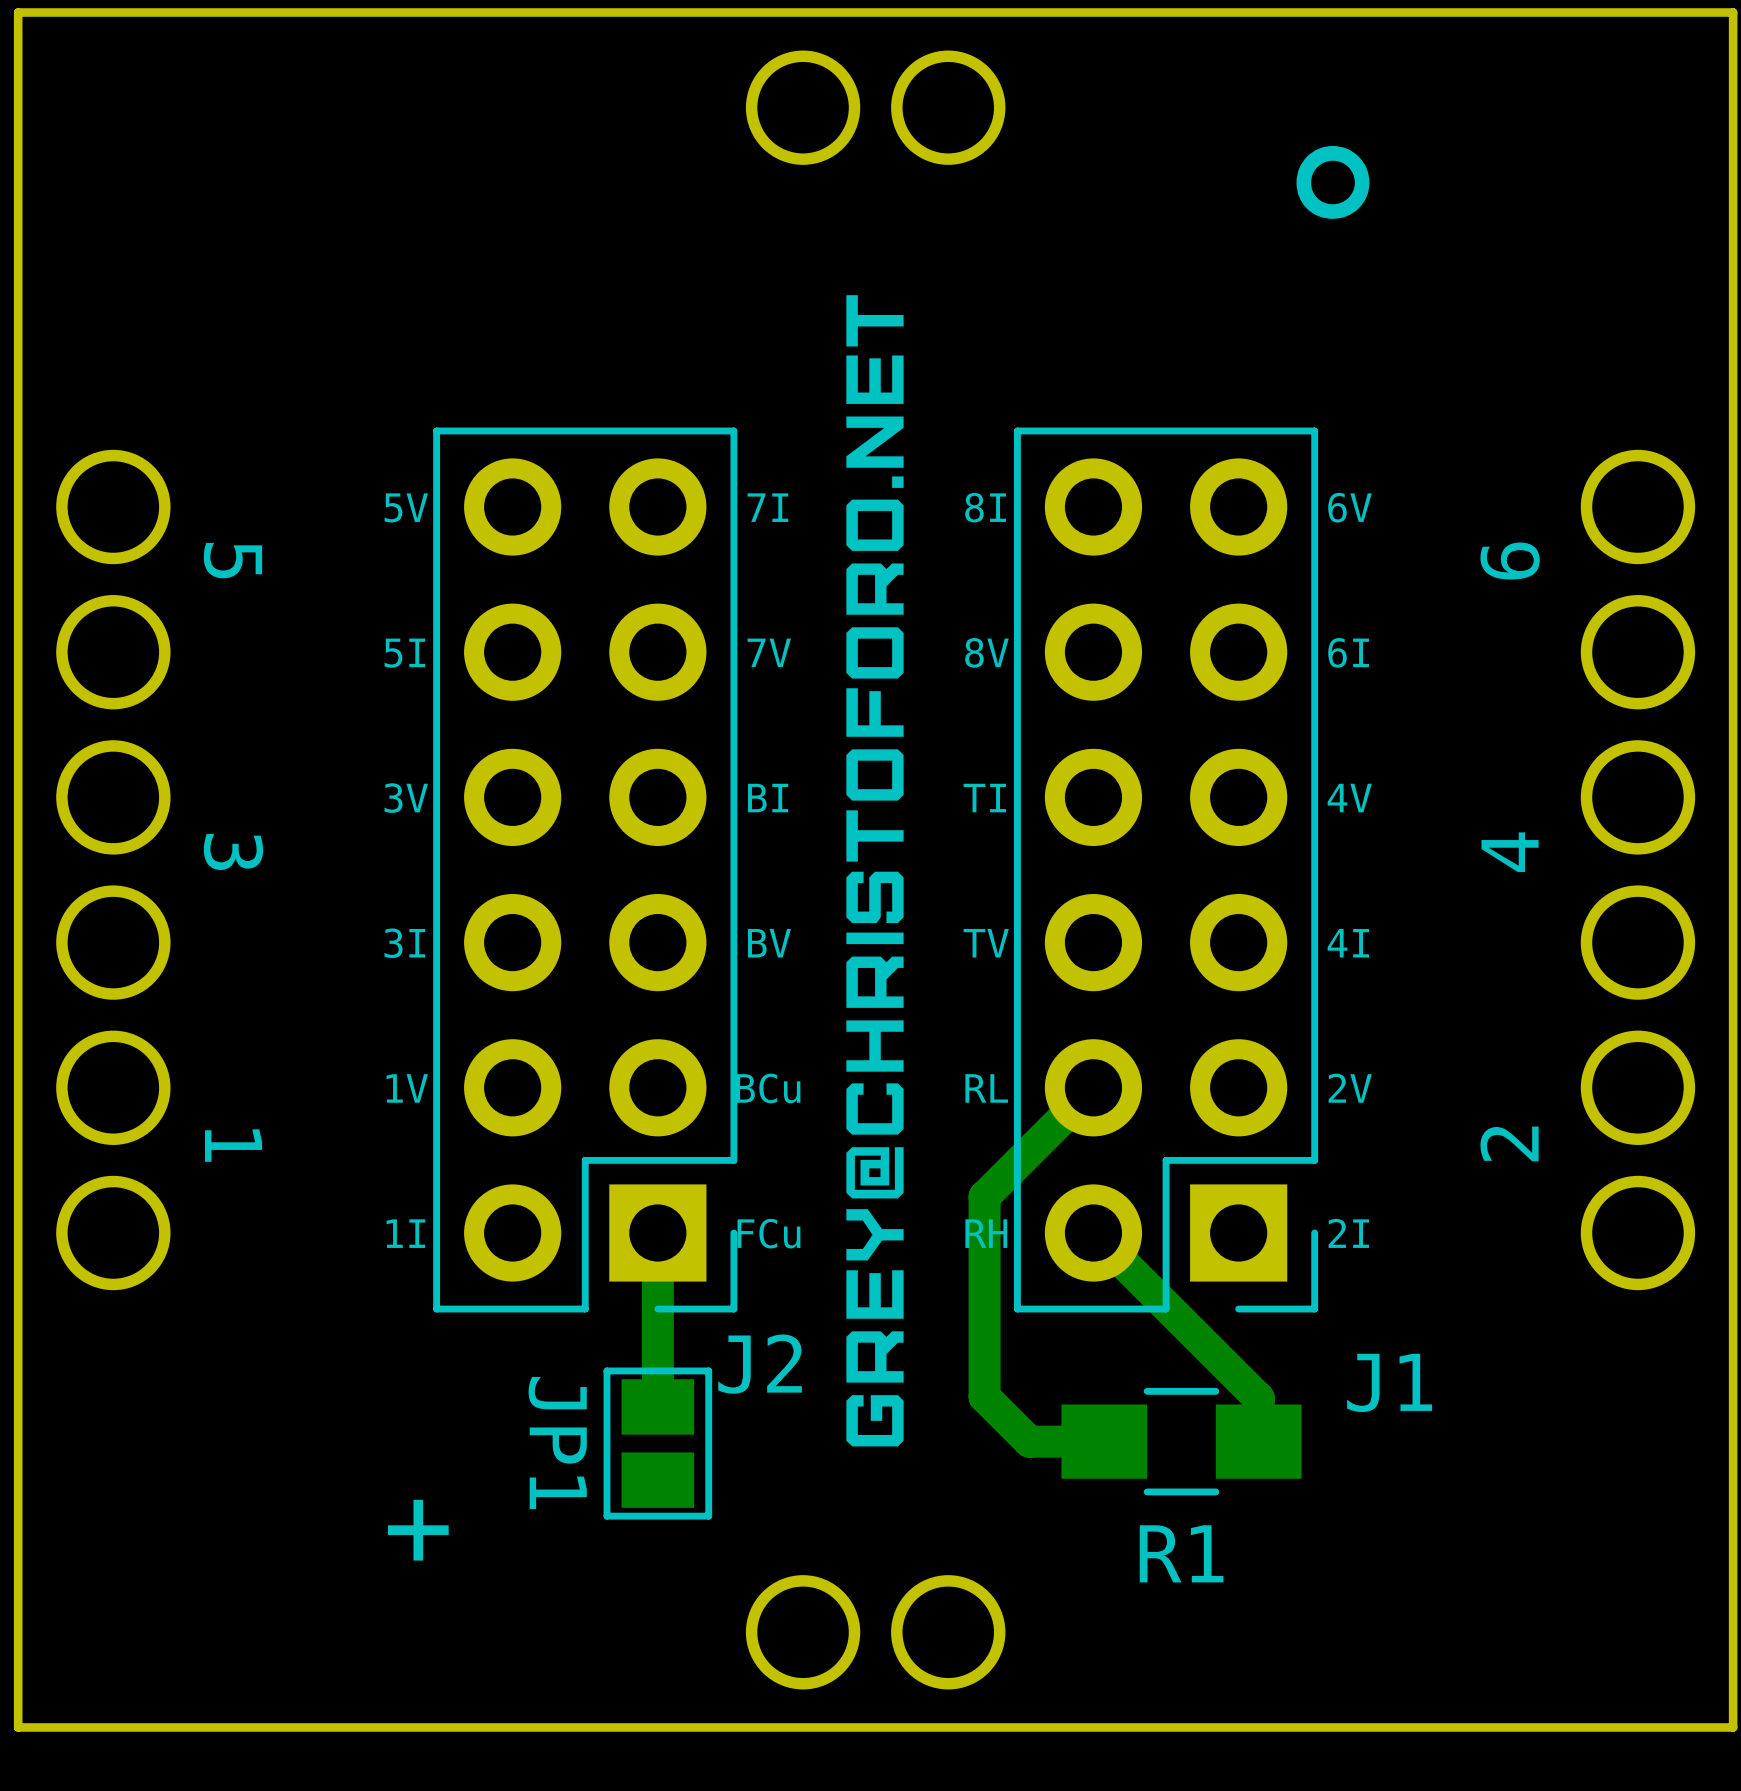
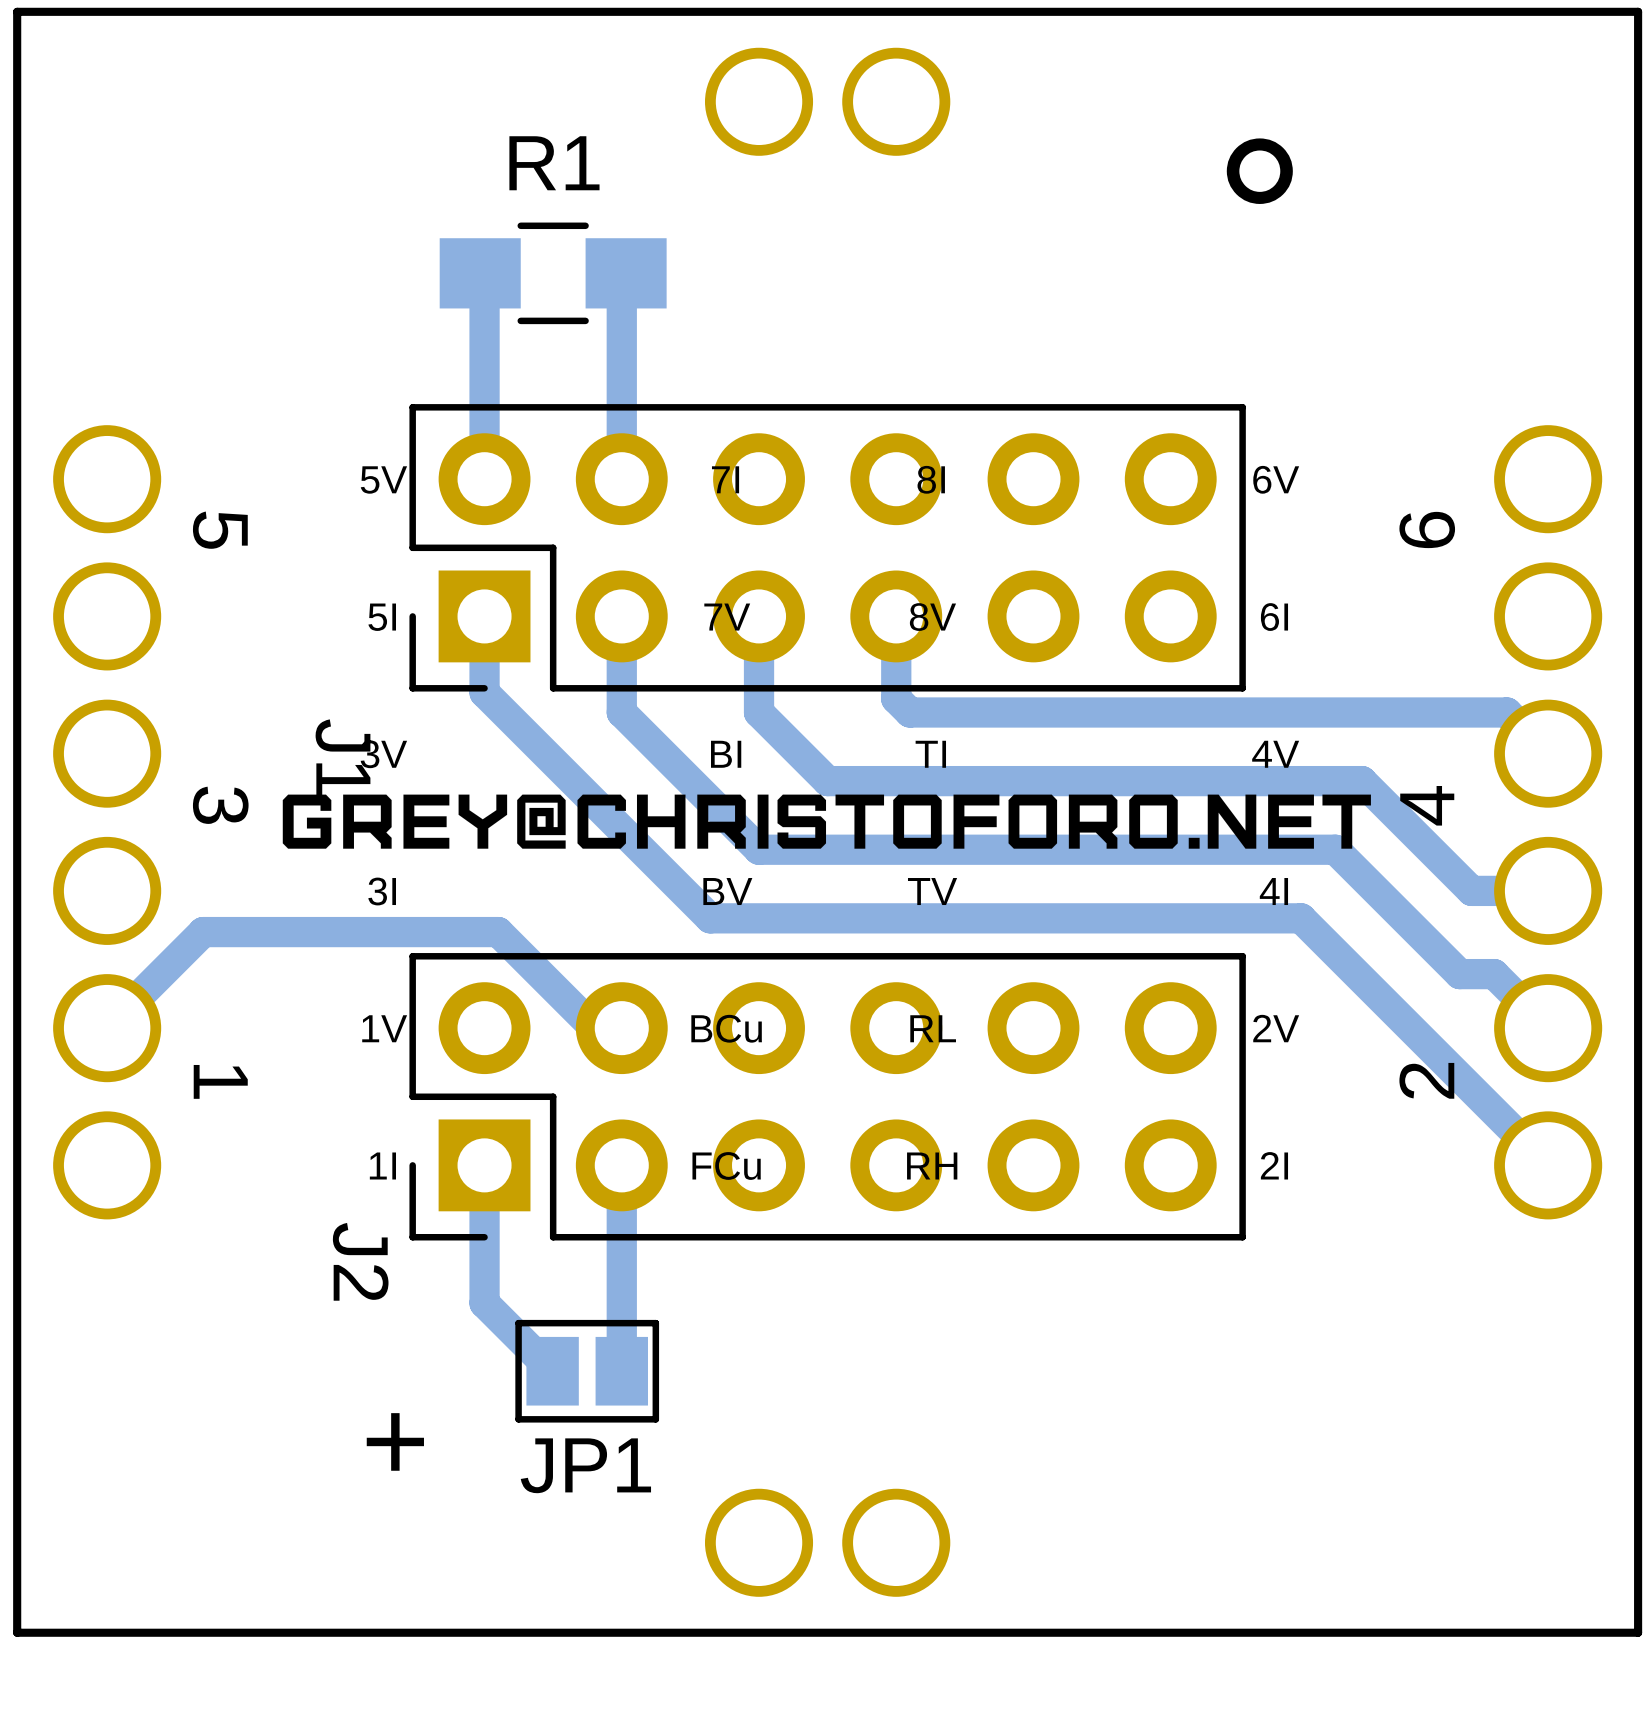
track: none -> (480, 273) (484, 277) (484, 479)
track: none -> (626, 273) (621, 277) (621, 479)
drawing shape: [846, 295, 904, 1447] -> [282, 794, 1371, 849]
track: none -> (484, 616) (484, 692) (710, 918) (1301, 918) (1548, 1165)
track: none -> (621, 616) (621, 712) (759, 849) (1335, 849) (1459, 974) (1494, 974) (1548, 1028)
track: none -> (759, 616) (759, 712) (827, 781) (1361, 781) (1471, 890) (1548, 890)
track: none -> (896, 616) (896, 698) (909, 712) (1506, 712) (1548, 753)
J2 rotation: 0° (585, 869) -> 90° clockwise (827, 1096)
J1 rotation: 0° (1166, 869) -> 90° clockwise (827, 547)
track: none -> (621, 1028) (594, 1028) (498, 932) (203, 932) (107, 1028)
track: (1093, 1087) (984, 1196) (984, 1396) (1029, 1441) (1104, 1441) -> none
track: none -> (484, 1165) (484, 1303) (552, 1371)
track: (1093, 1232) (1258, 1398) (1258, 1441) -> none
R1 position: (1181, 1441) -> (553, 273)
JP1 name position: JP1 (557, 1442) -> JP1 (585, 1465)
JP1 rotation: 0° (657, 1443) -> 90° clockwise (587, 1371)
R1 name position: R1 (1181, 1553) -> R1 (554, 163)

